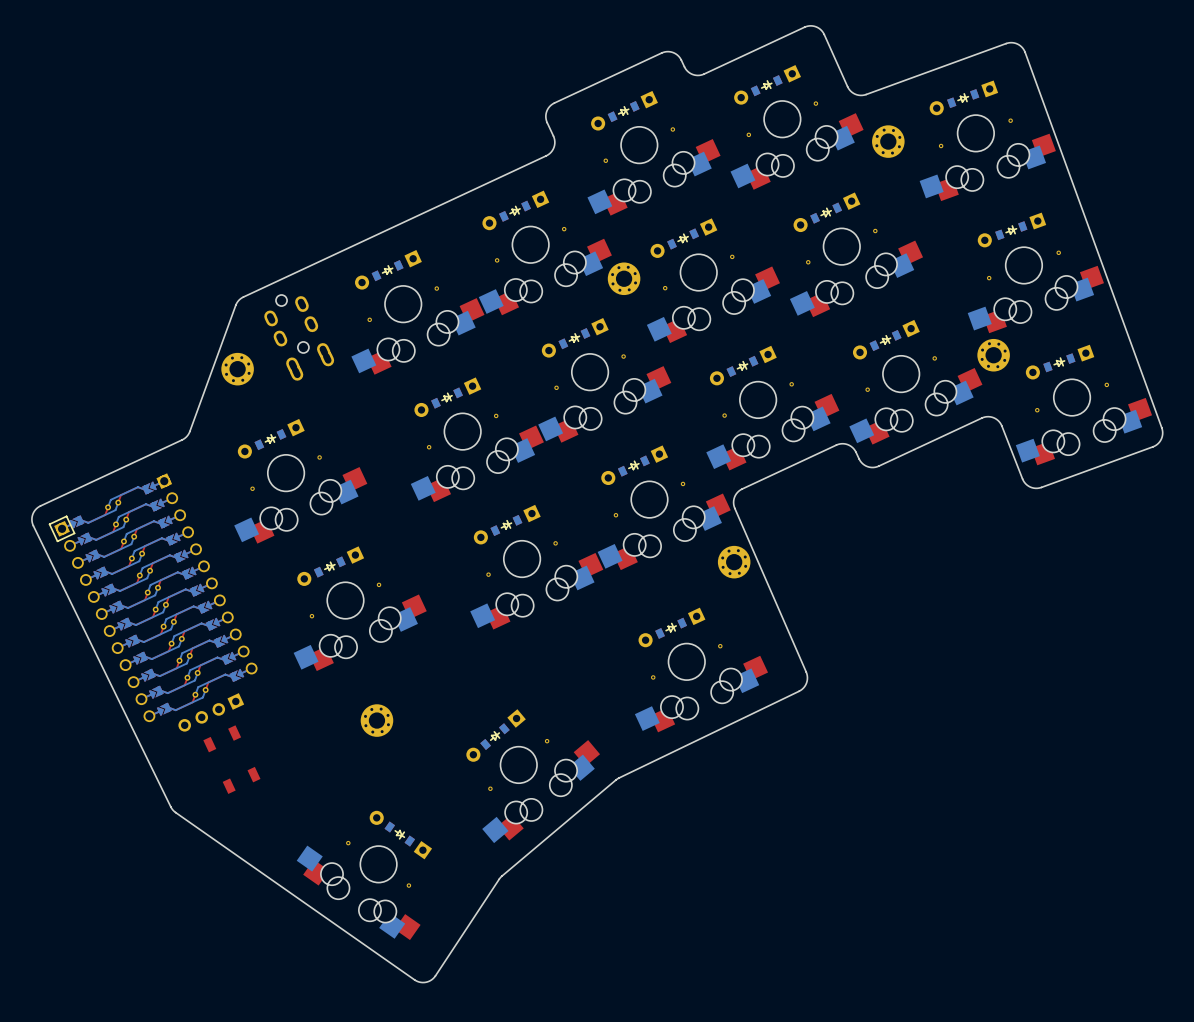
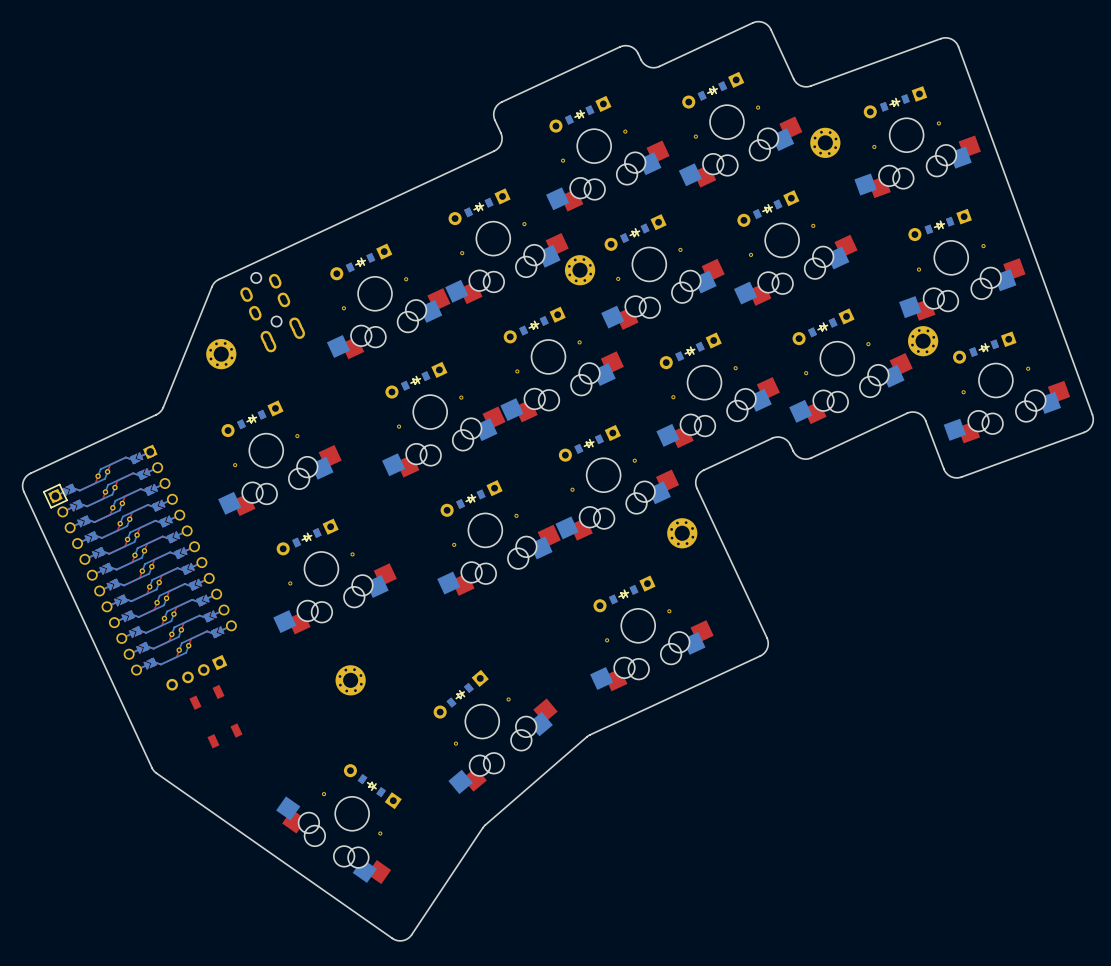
board edge: (804, 27) (701, 75) (688, 72) (675, 54) (663, 52) (554, 103) (548, 107) (545, 115) (554, 141) (553, 149) (548, 154) (242, 297) (235, 305) (186, 436) (40, 506) (32, 514) (33, 525) (172, 810) (417, 981) (425, 982) (434, 977) (501, 876) (615, 780) (799, 691) (804, 686) (807, 679) (806, 672) (734, 506) (733, 499) (738, 491) (840, 443) (852, 447) (864, 464) (877, 466) (986, 416) (993, 417) (1000, 423) (1023, 480) (1033, 488) (1041, 487) (1152, 446) (1161, 439) (1161, 427) (1022, 48) (1015, 43) (1007, 43) (866, 94) (858, 95) (848, 88) (822, 31) (814, 26) (804, 27) -> (752, 22) (655, 67) (644, 64) (633, 47) (621, 46) (501, 102) (495, 107) (493, 112) (502, 138) (500, 144) (495, 150) (217, 280) (212, 286) (160, 411) (30, 473) (23, 481) (23, 491) (153, 770) (395, 939) (404, 940) (410, 936) (484, 825) (587, 736) (760, 656) (766, 651) (768, 645) (766, 637) (696, 487) (696, 479) (701, 471) (776, 437) (787, 441) (797, 456) (809, 458) (913, 412) (919, 413) (925, 419) (945, 472) (951, 476) (957, 477) (1084, 432) (1092, 423) (1092, 414) (956, 42) (950, 38) (942, 38) (810, 86) (804, 86) (794, 80) (769, 27) (761, 22) (752, 22)
part position: (299, 337) -> (272, 312)
part footprint: [49, 473, 258, 723] -> [43, 444, 237, 676]

